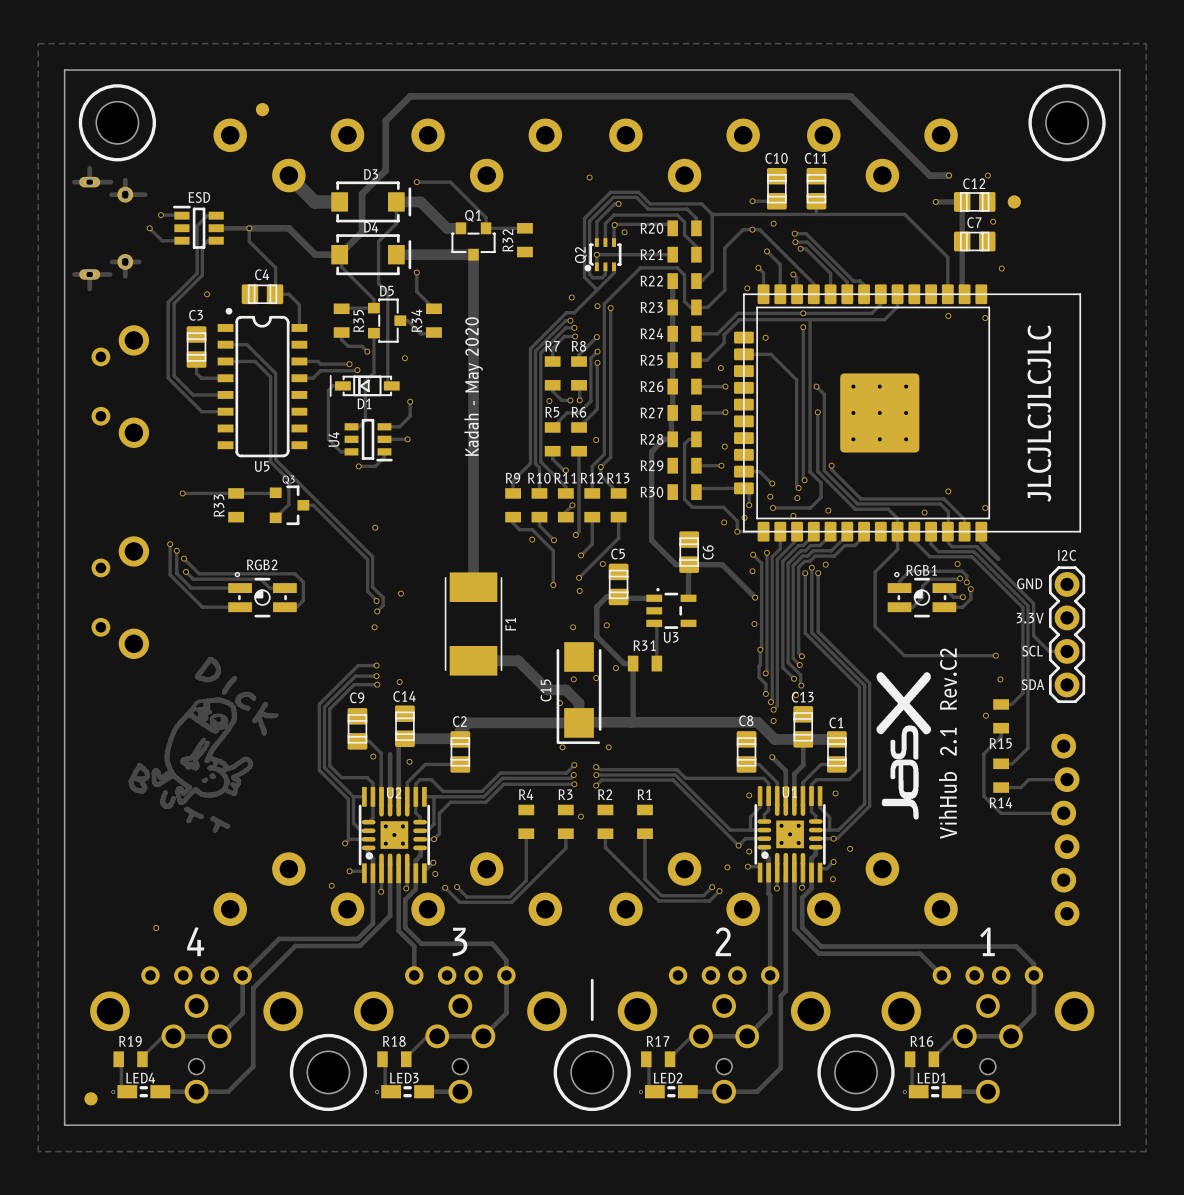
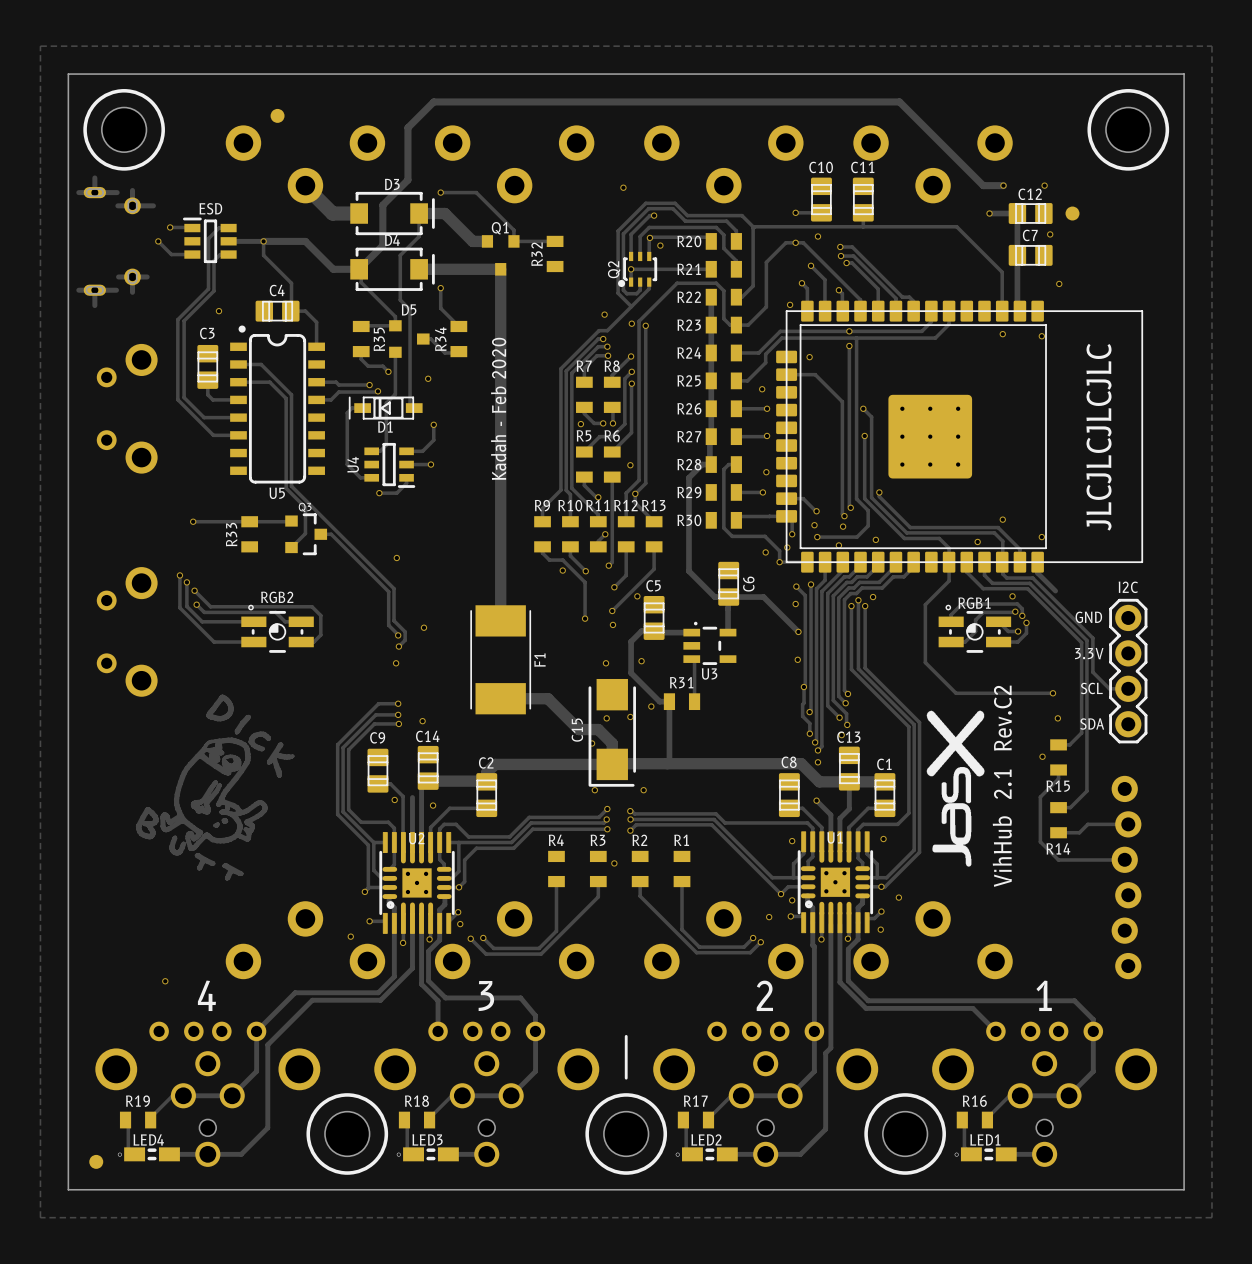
Q1 footprint: [451, 222, 496, 261] -> [481, 235, 520, 276]
D5 footprint: [368, 298, 407, 343] -> [389, 320, 430, 358]
D1 footprint: [329, 375, 400, 397] -> [348, 396, 423, 420]
text: Kadah - May 2020 (473, 386) -> Kadah - Feb 2020 (498, 408)

